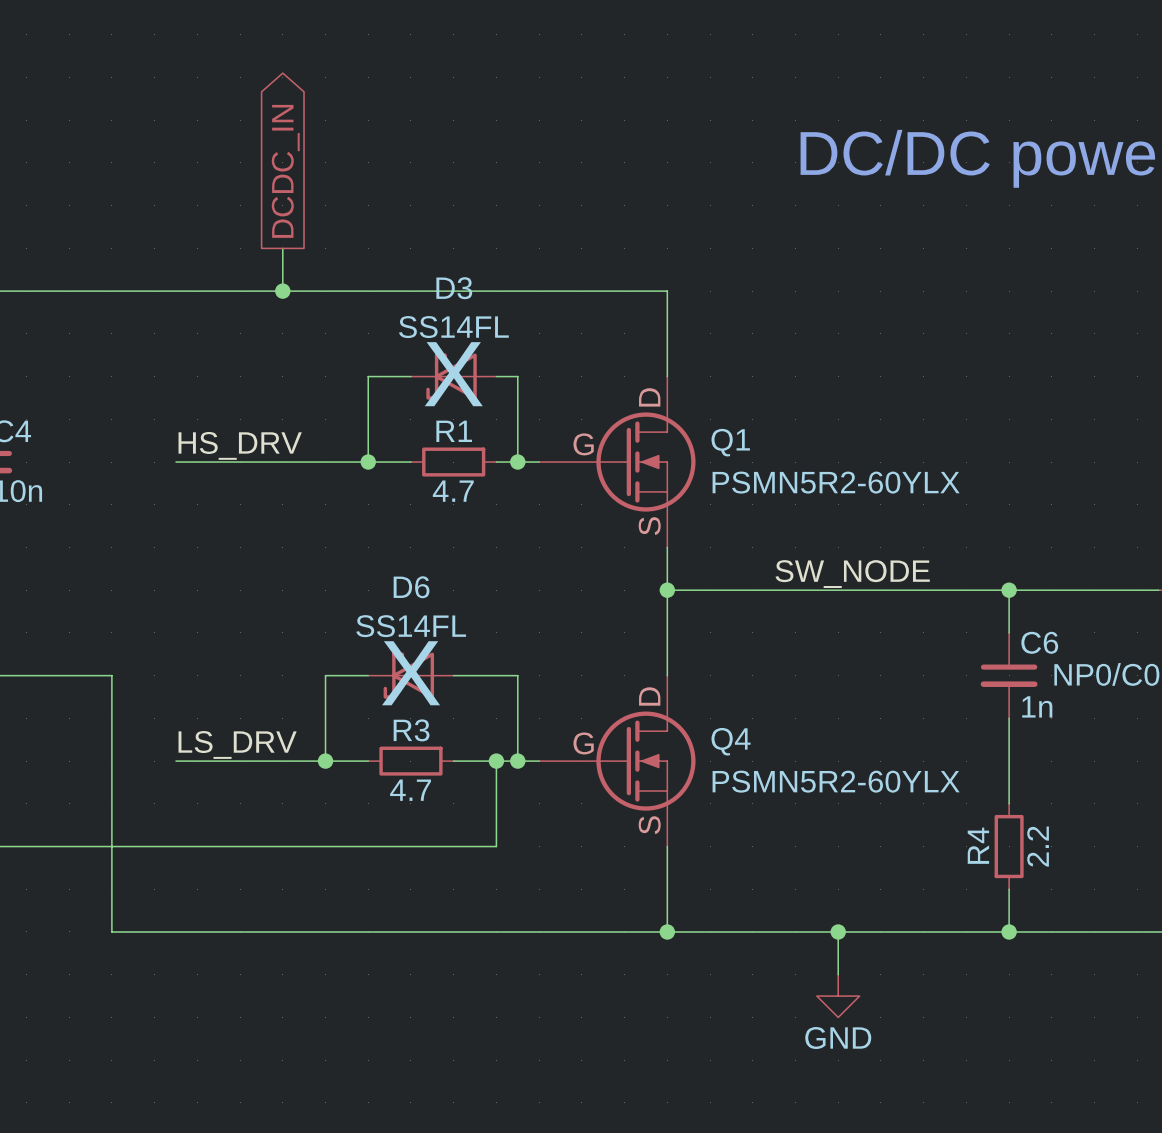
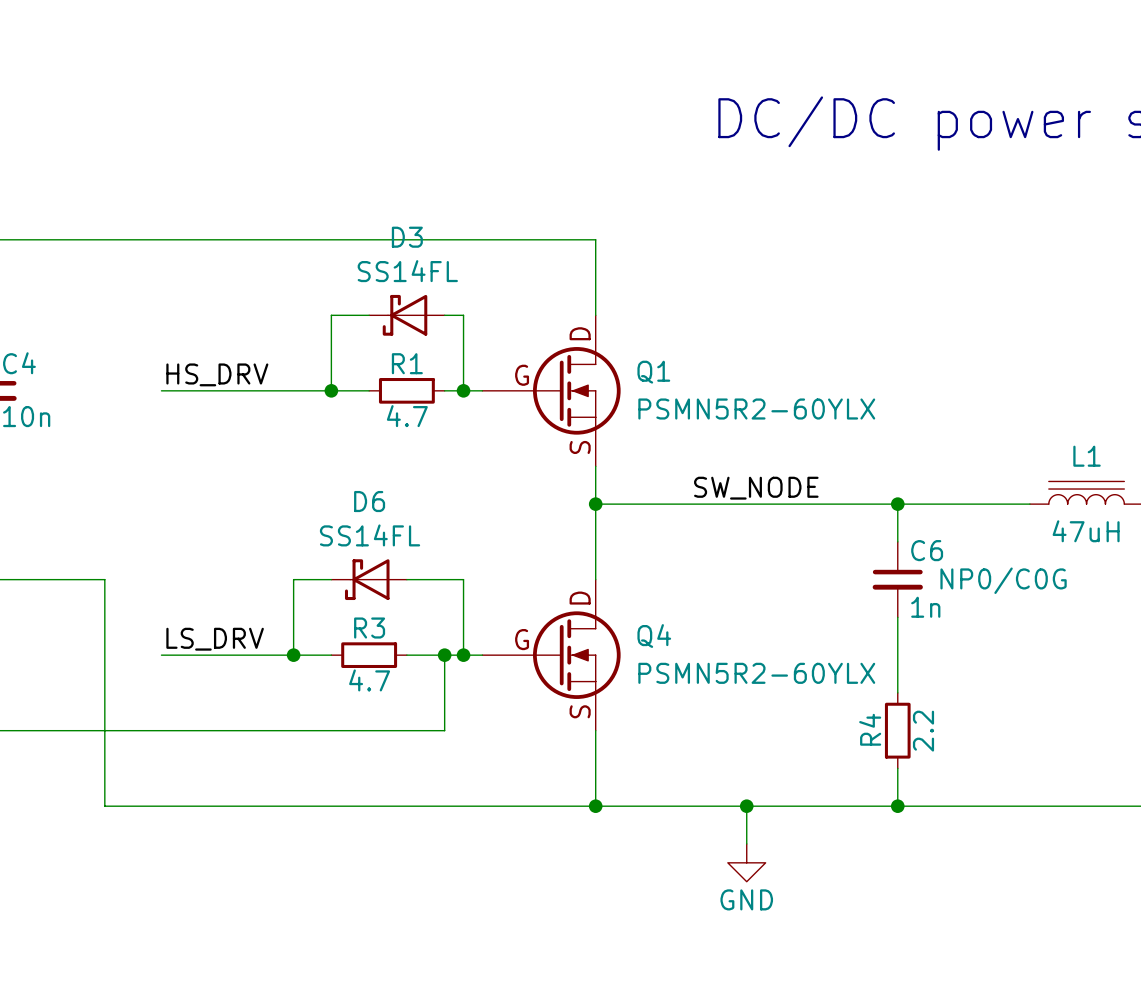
global label: DCDC_IN (285, 171) -> none
wire: (282, 248) (282, 291) -> none
junction: (282, 291) -> none
D3 text: X (453, 374) -> none
D6 text: X (411, 673) -> none

